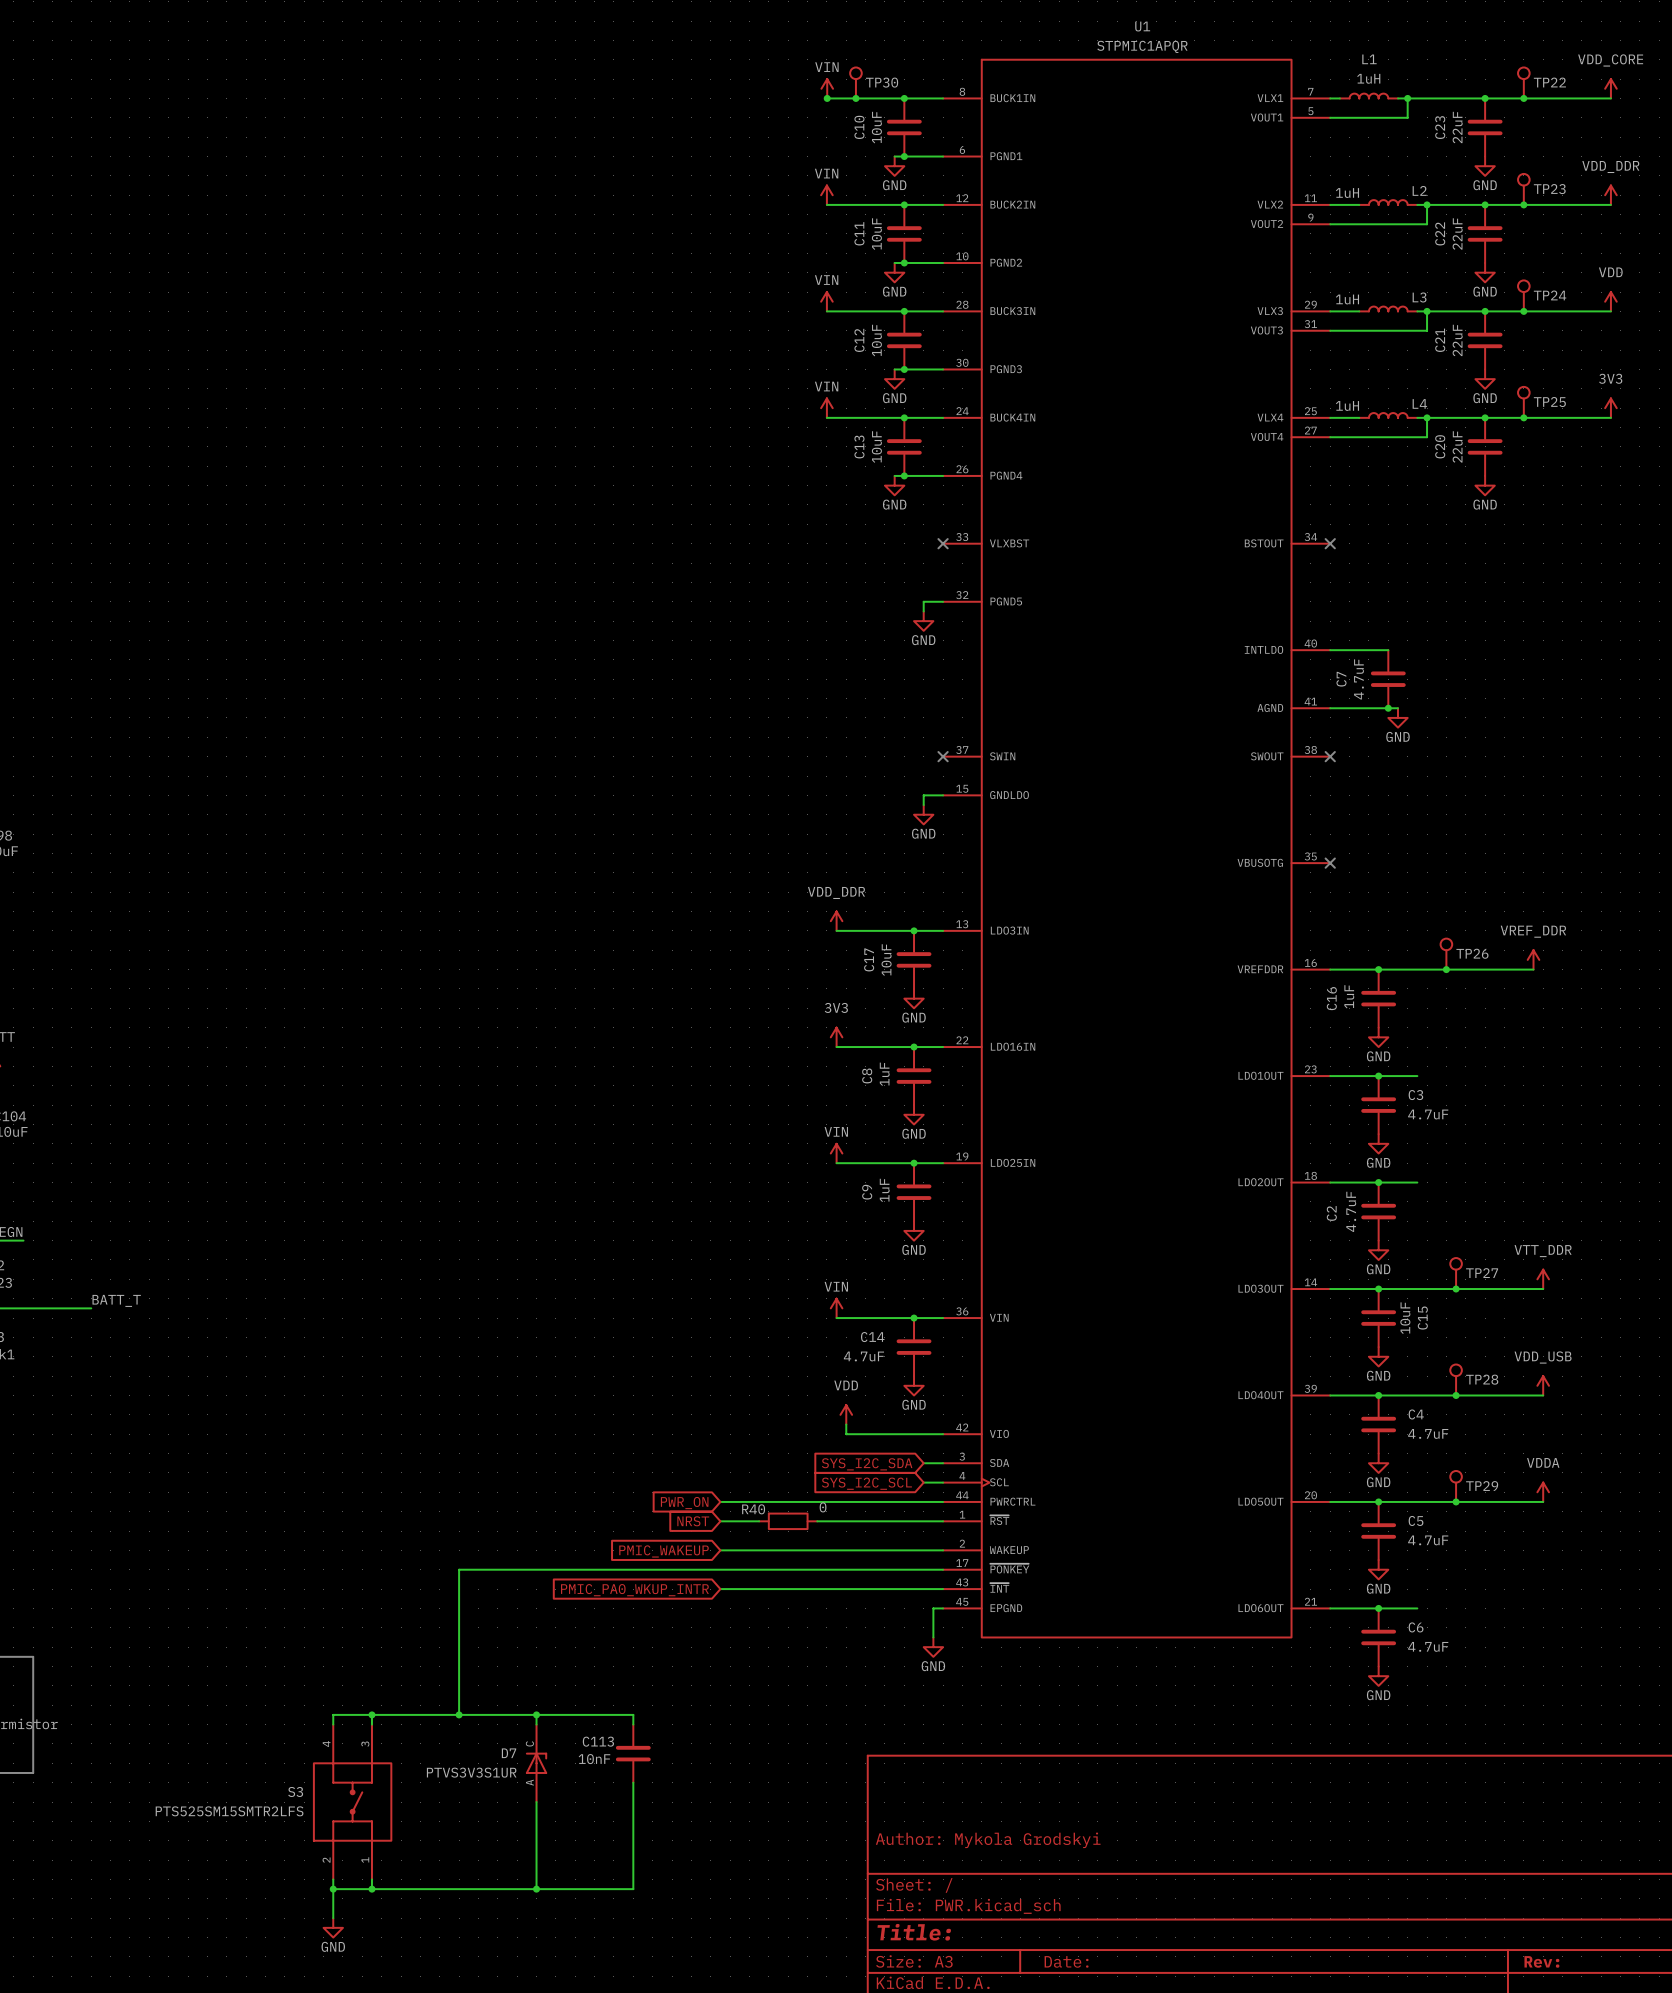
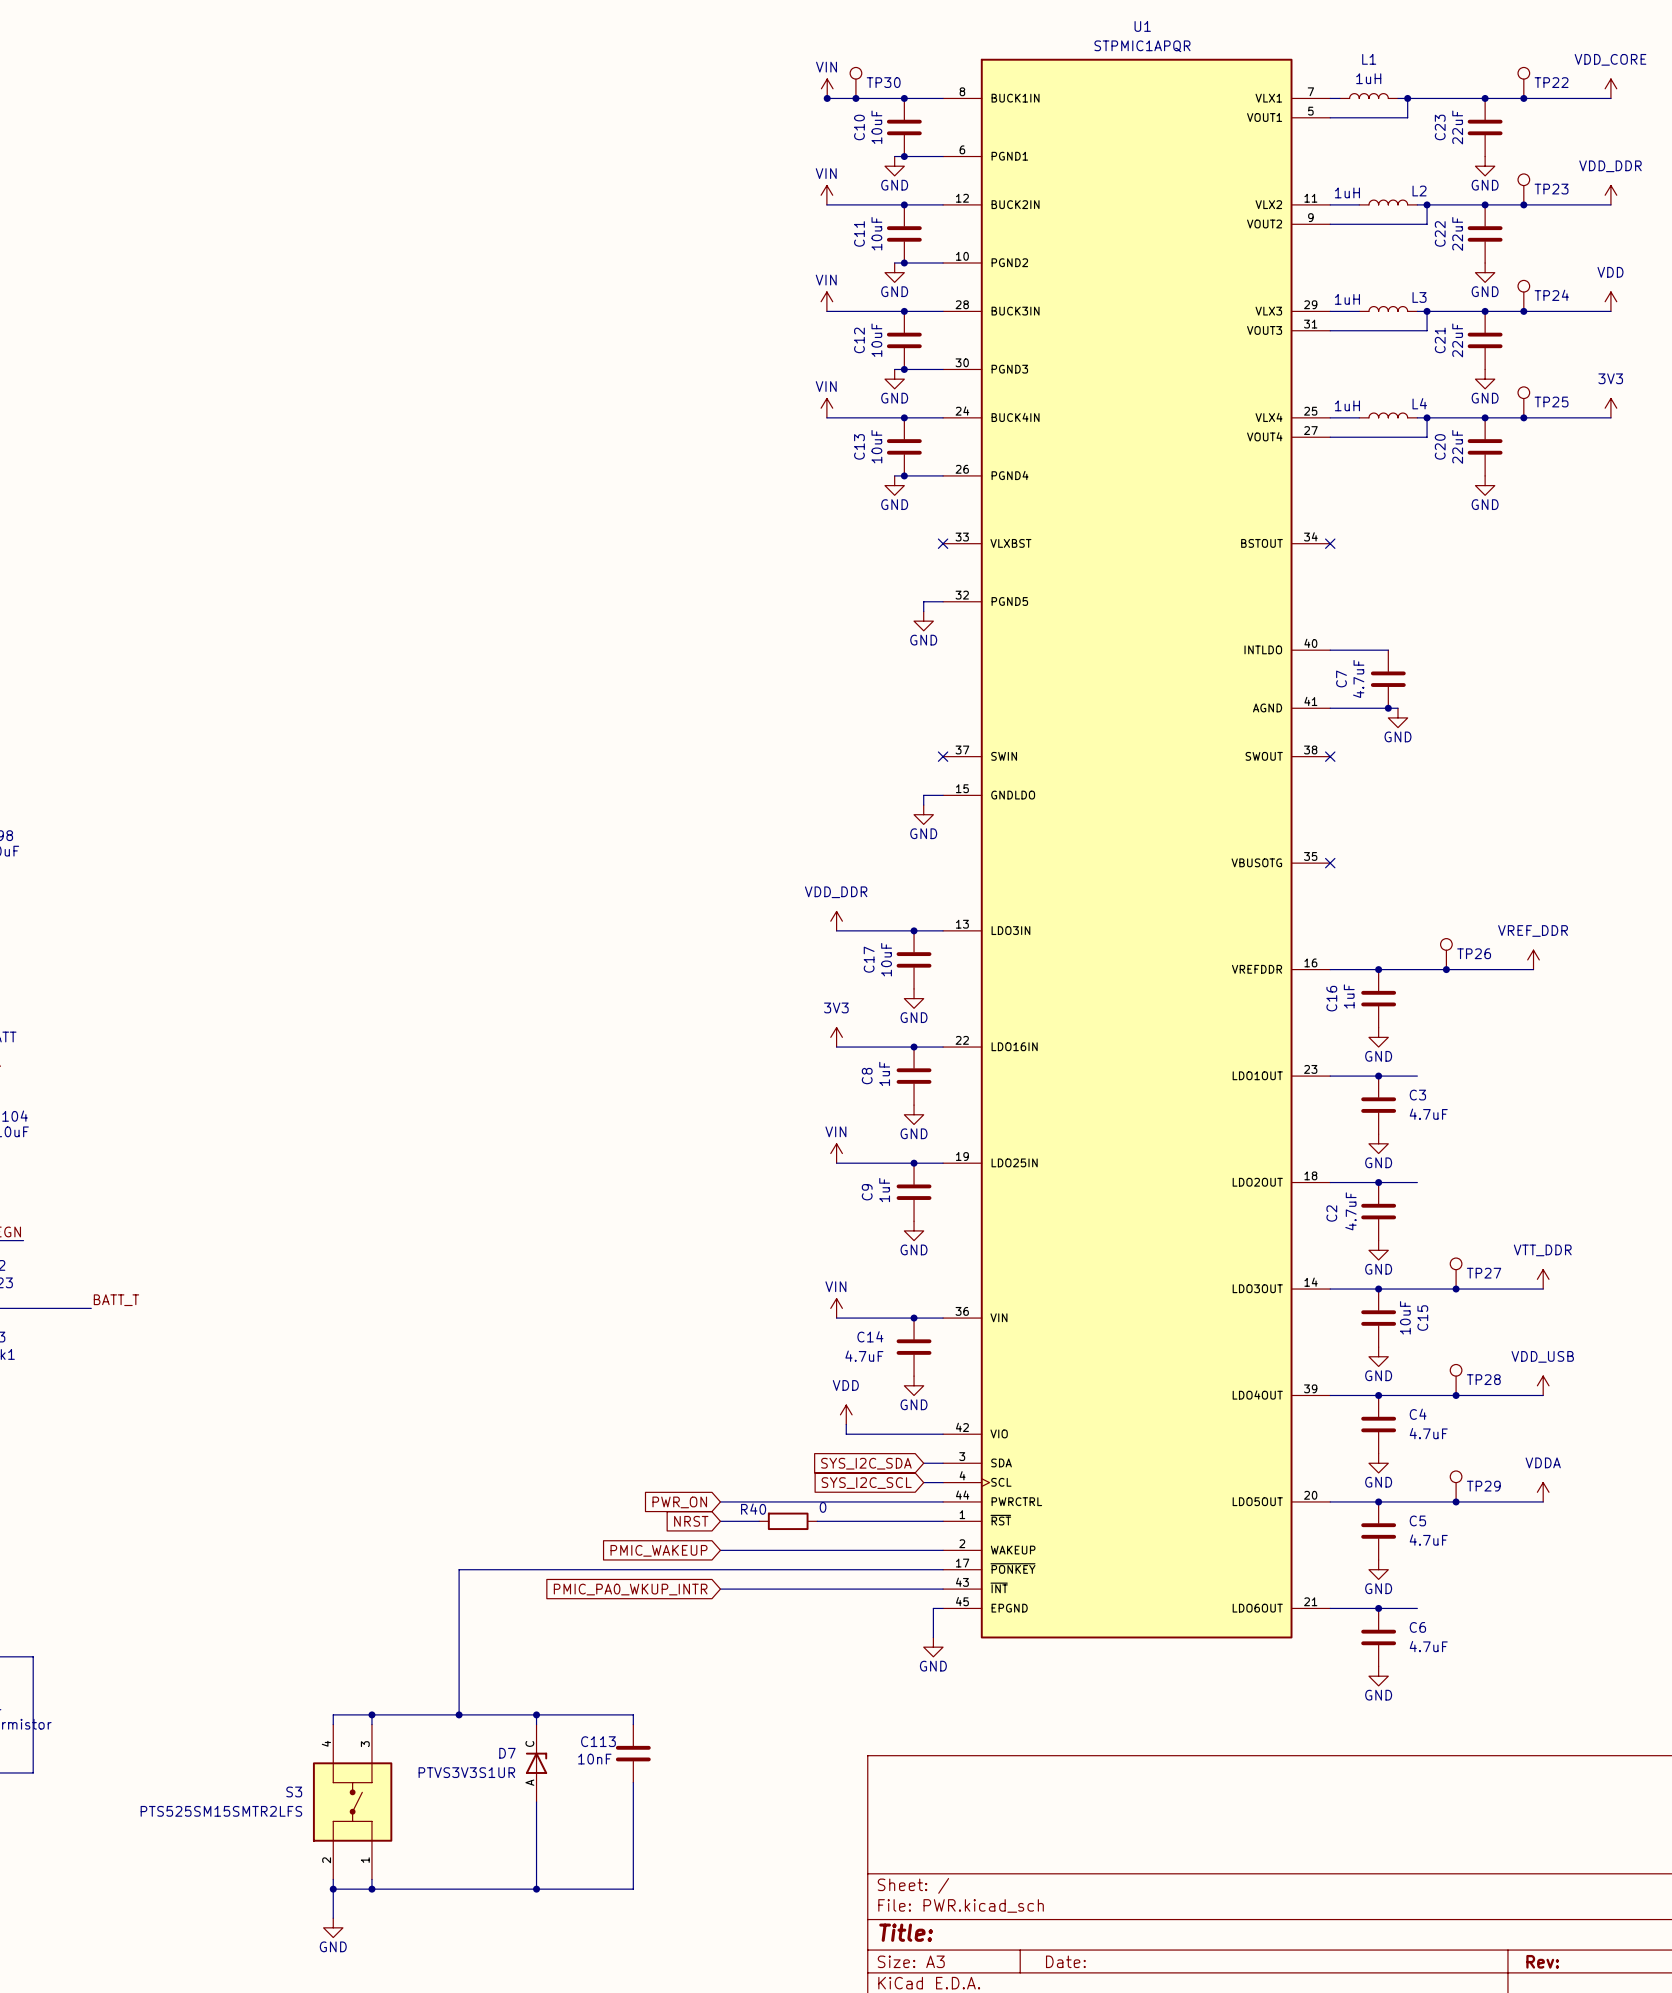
title block: Author: Mykola Grodskyi (988, 1840) -> none

